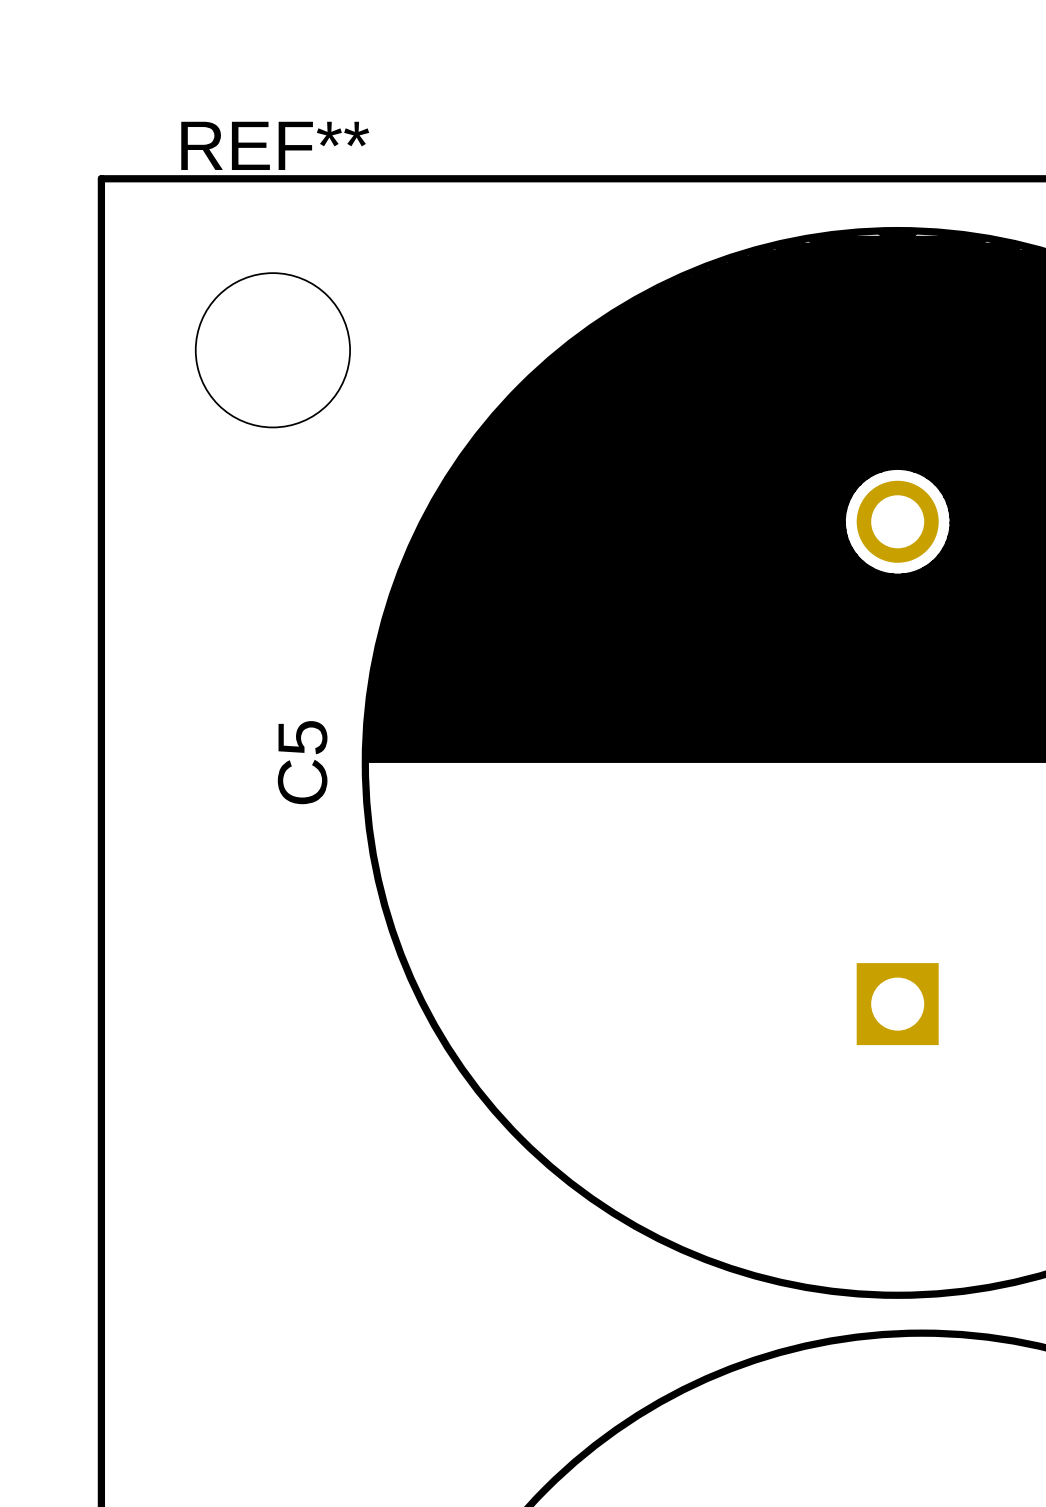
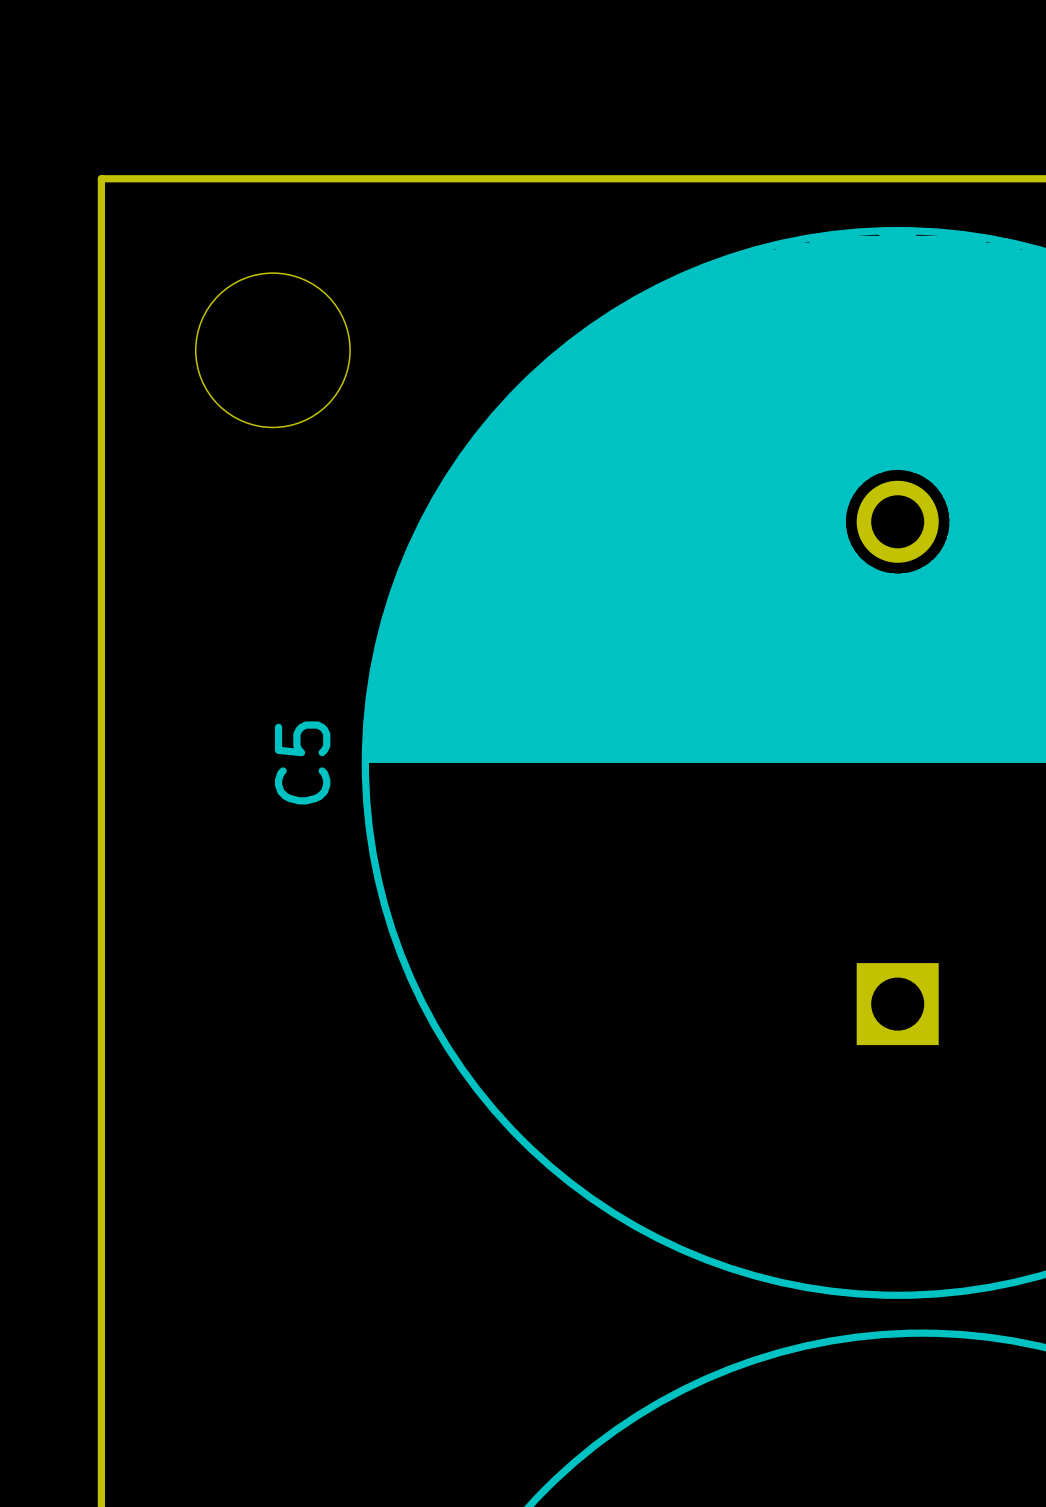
REF** name: REF** (275, 145) -> none

